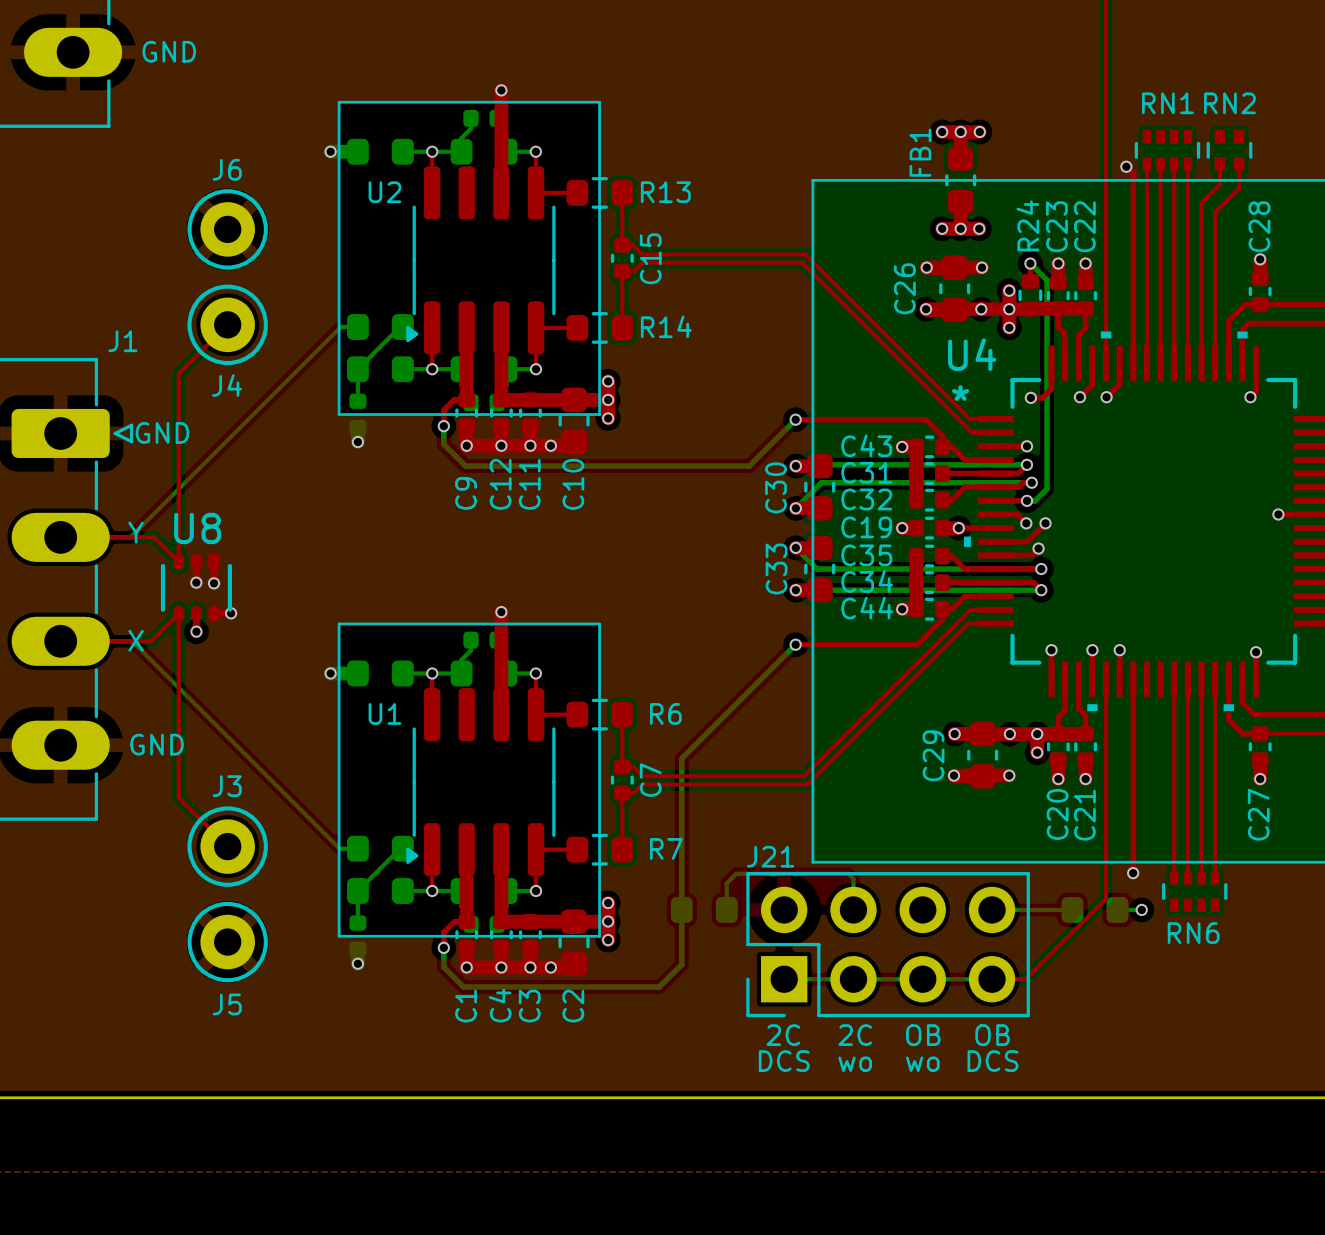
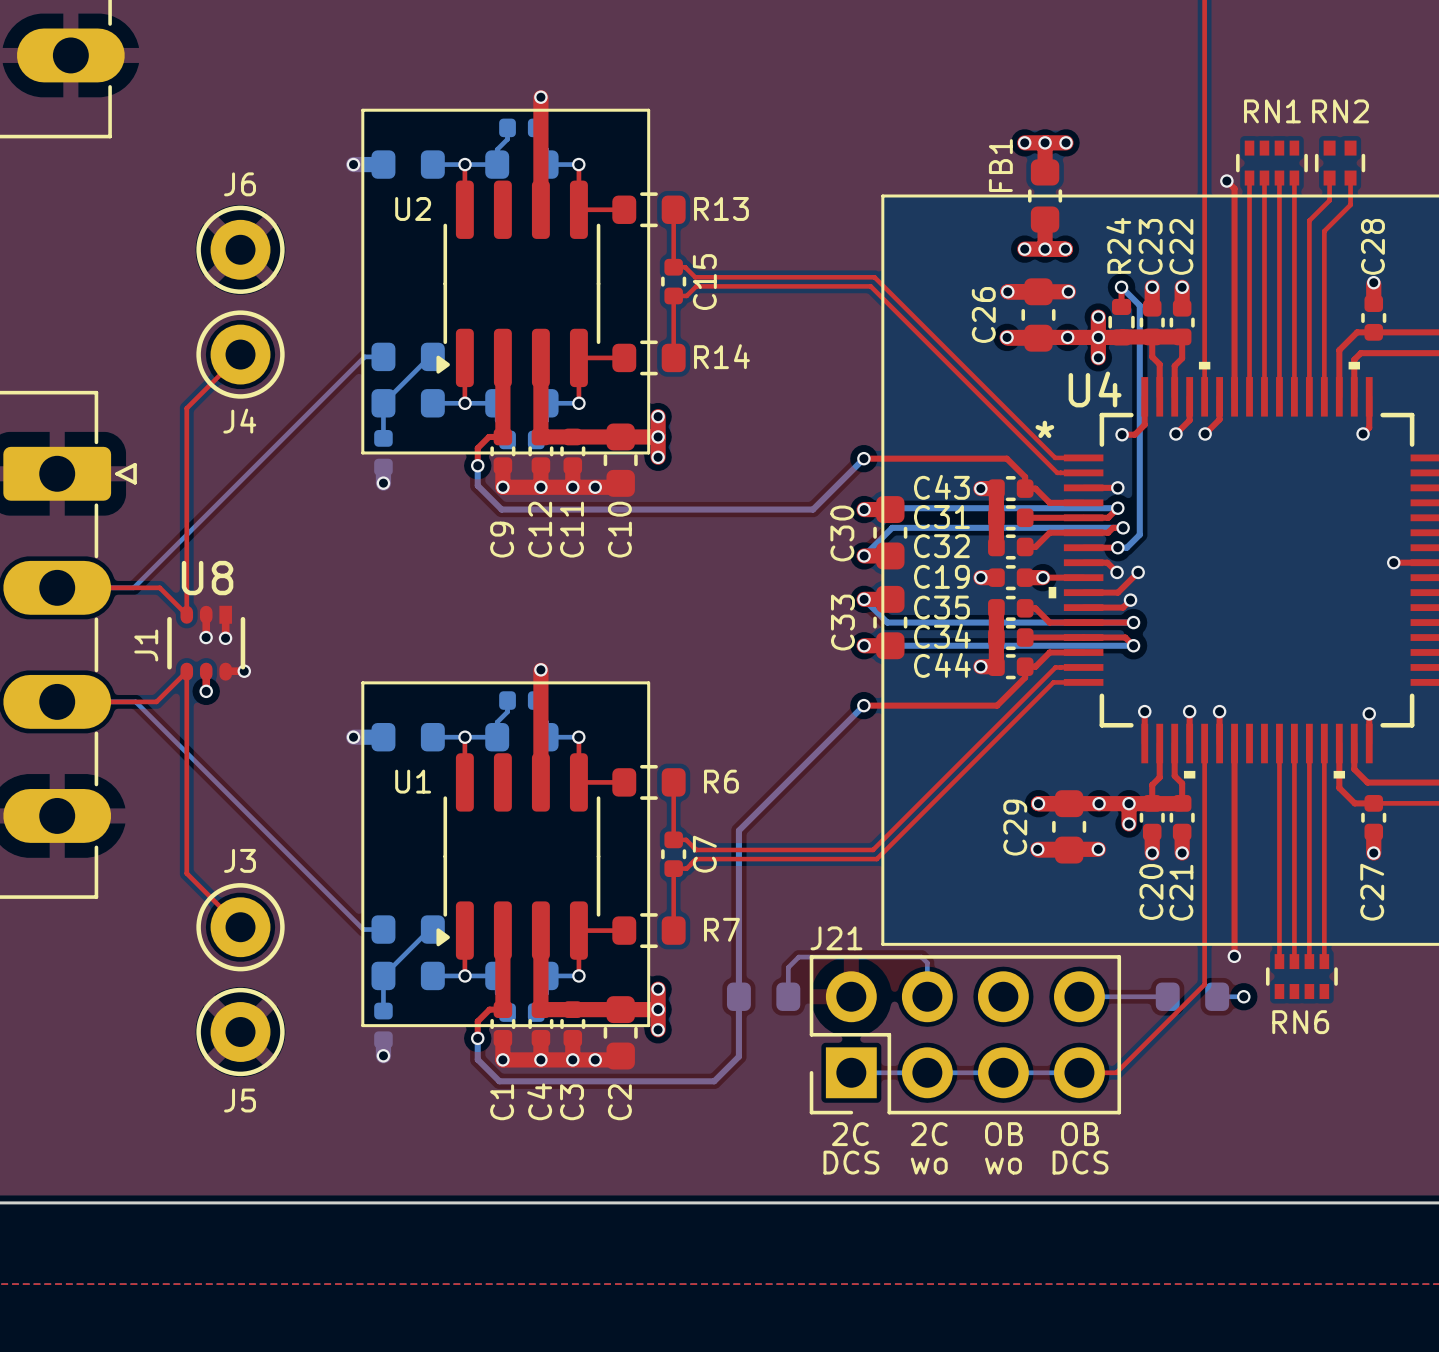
text: GND (169, 51) -> none
J1 name rotation: 0° (122, 341) -> 90° counterclockwise (146, 645)
J1 name position: J1 (122, 341) -> J1 (146, 645)
U4 name position: U4 (972, 354) -> U4 (1095, 389)
text: GND (162, 432) -> none
text: Y (136, 532) -> none
text: X (136, 640) -> none
text: GND (156, 744) -> none

